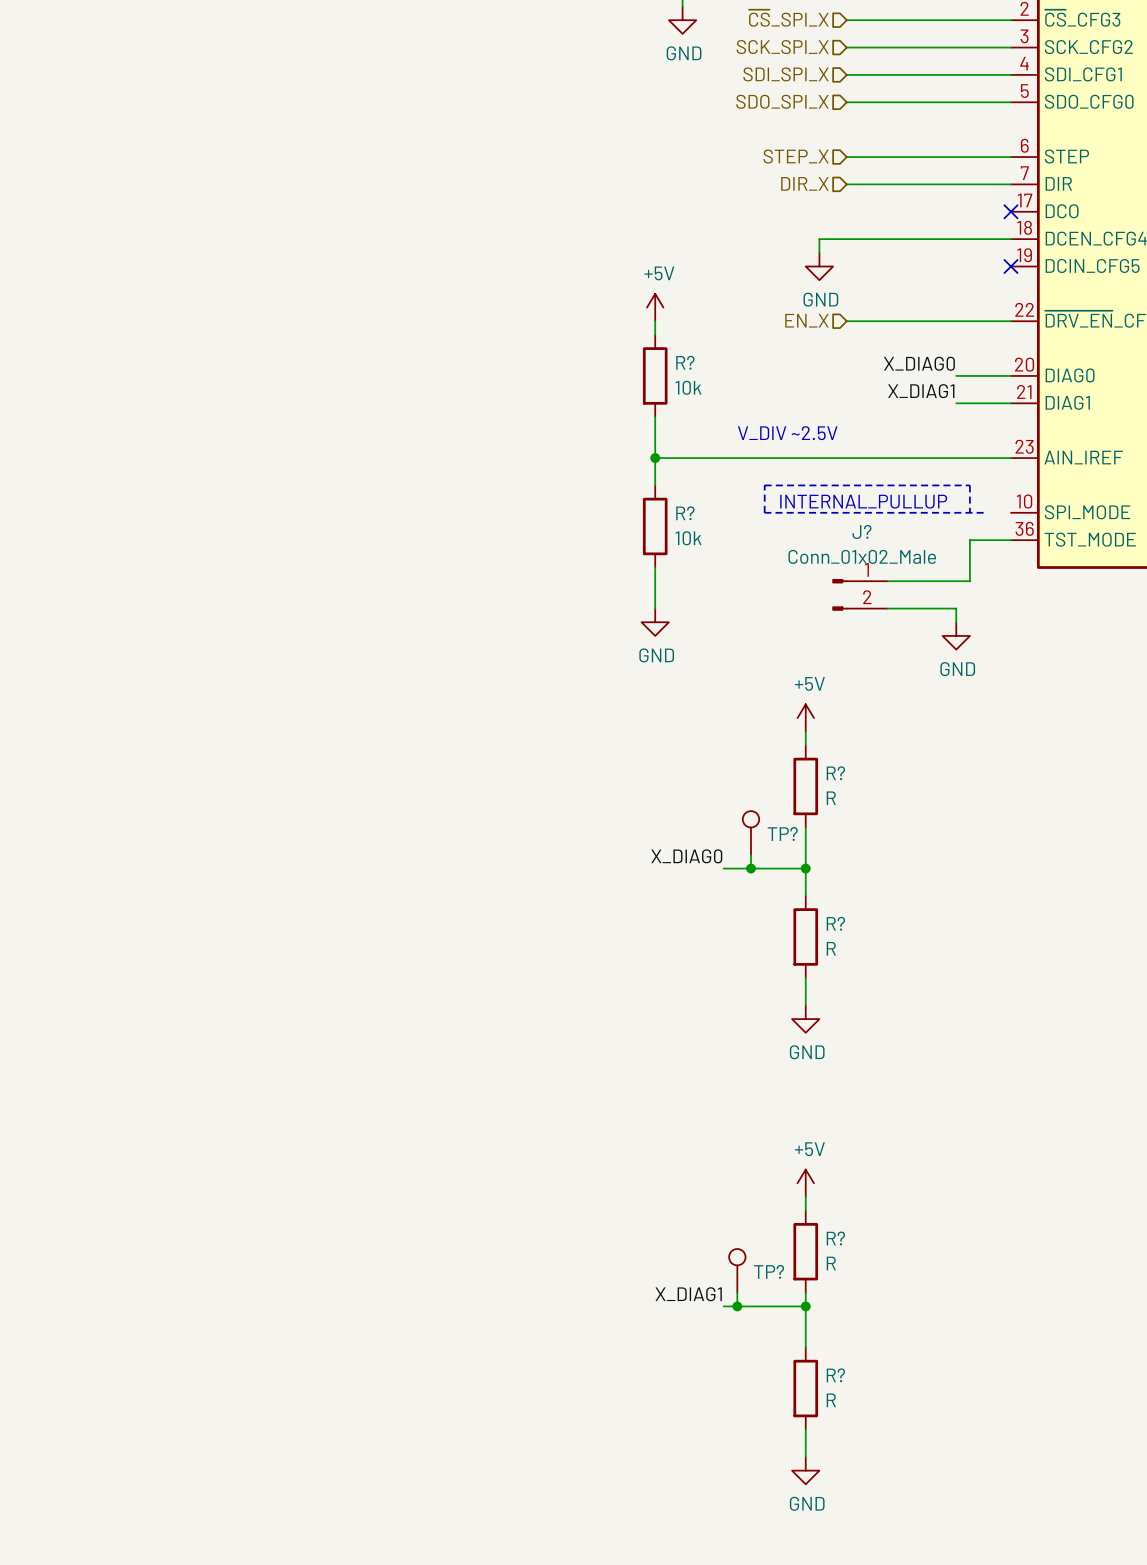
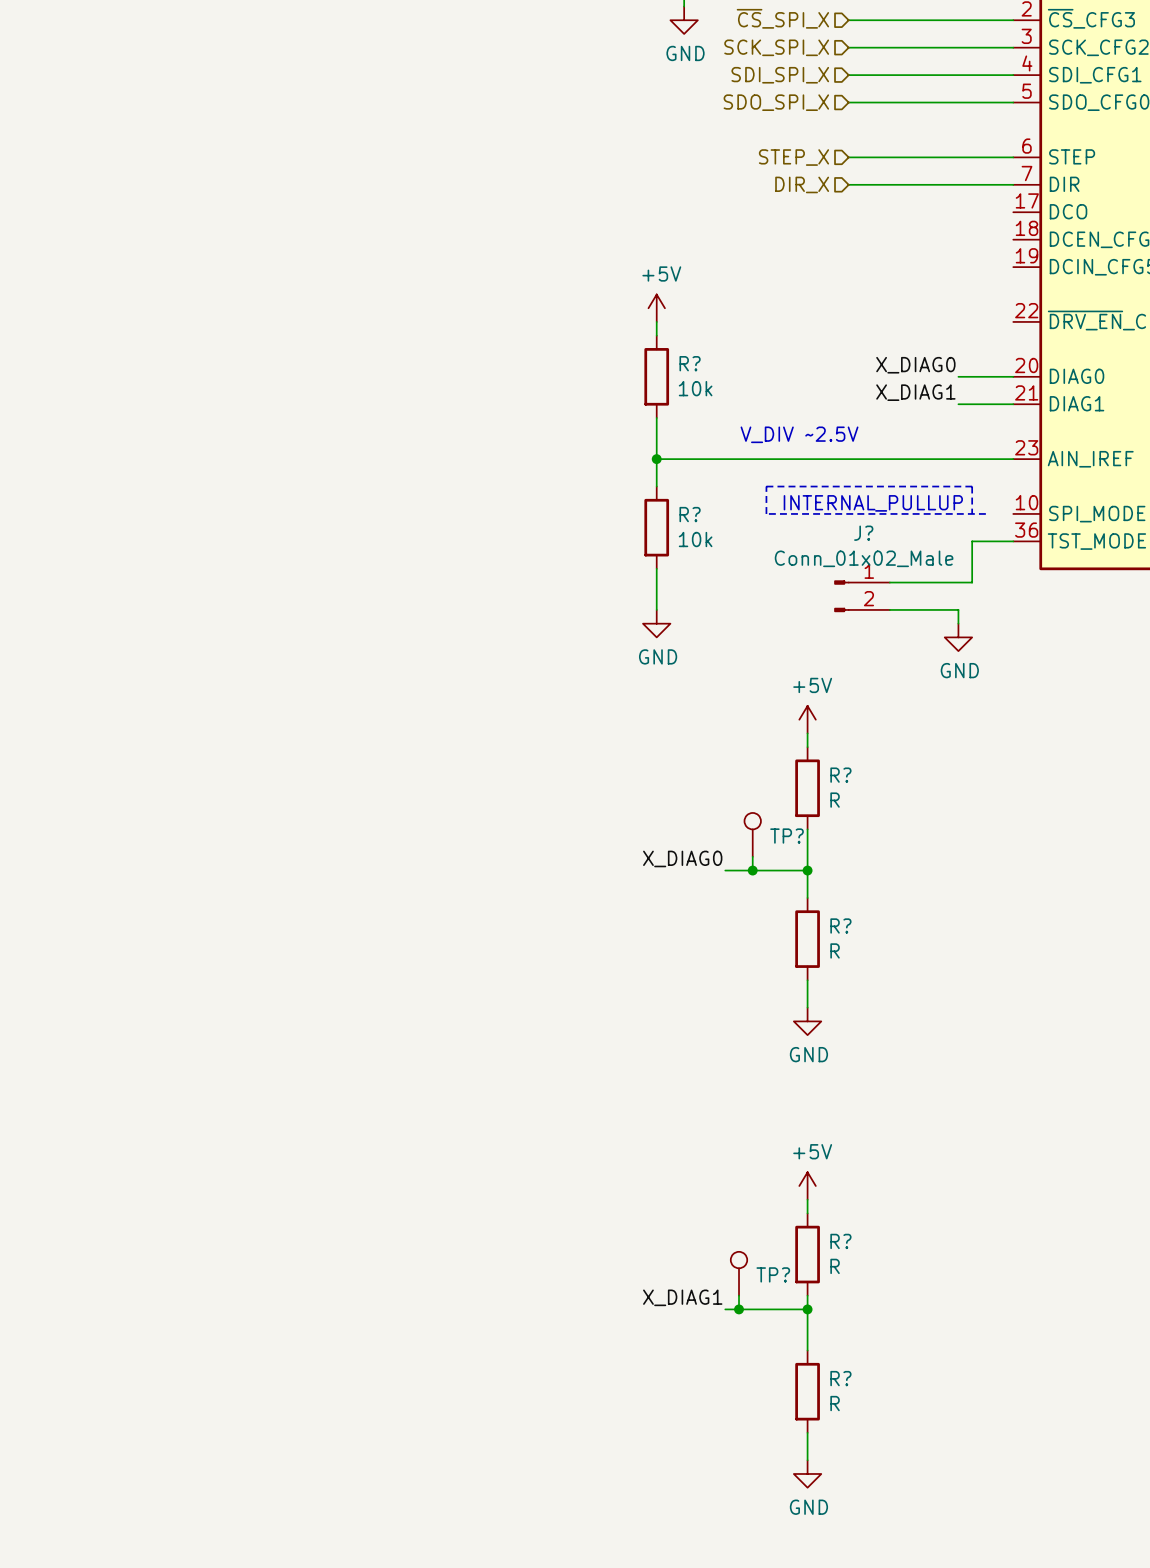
no-connect mark: (1010, 211) -> none
wire: (1010, 239) (819, 239) (819, 252) -> none
power symbol: GND (819, 266) -> none
no-connect mark: (1010, 266) -> none
hierarchical label: EN_X (806, 320) -> none
wire: (846, 321) (1010, 321) -> none

